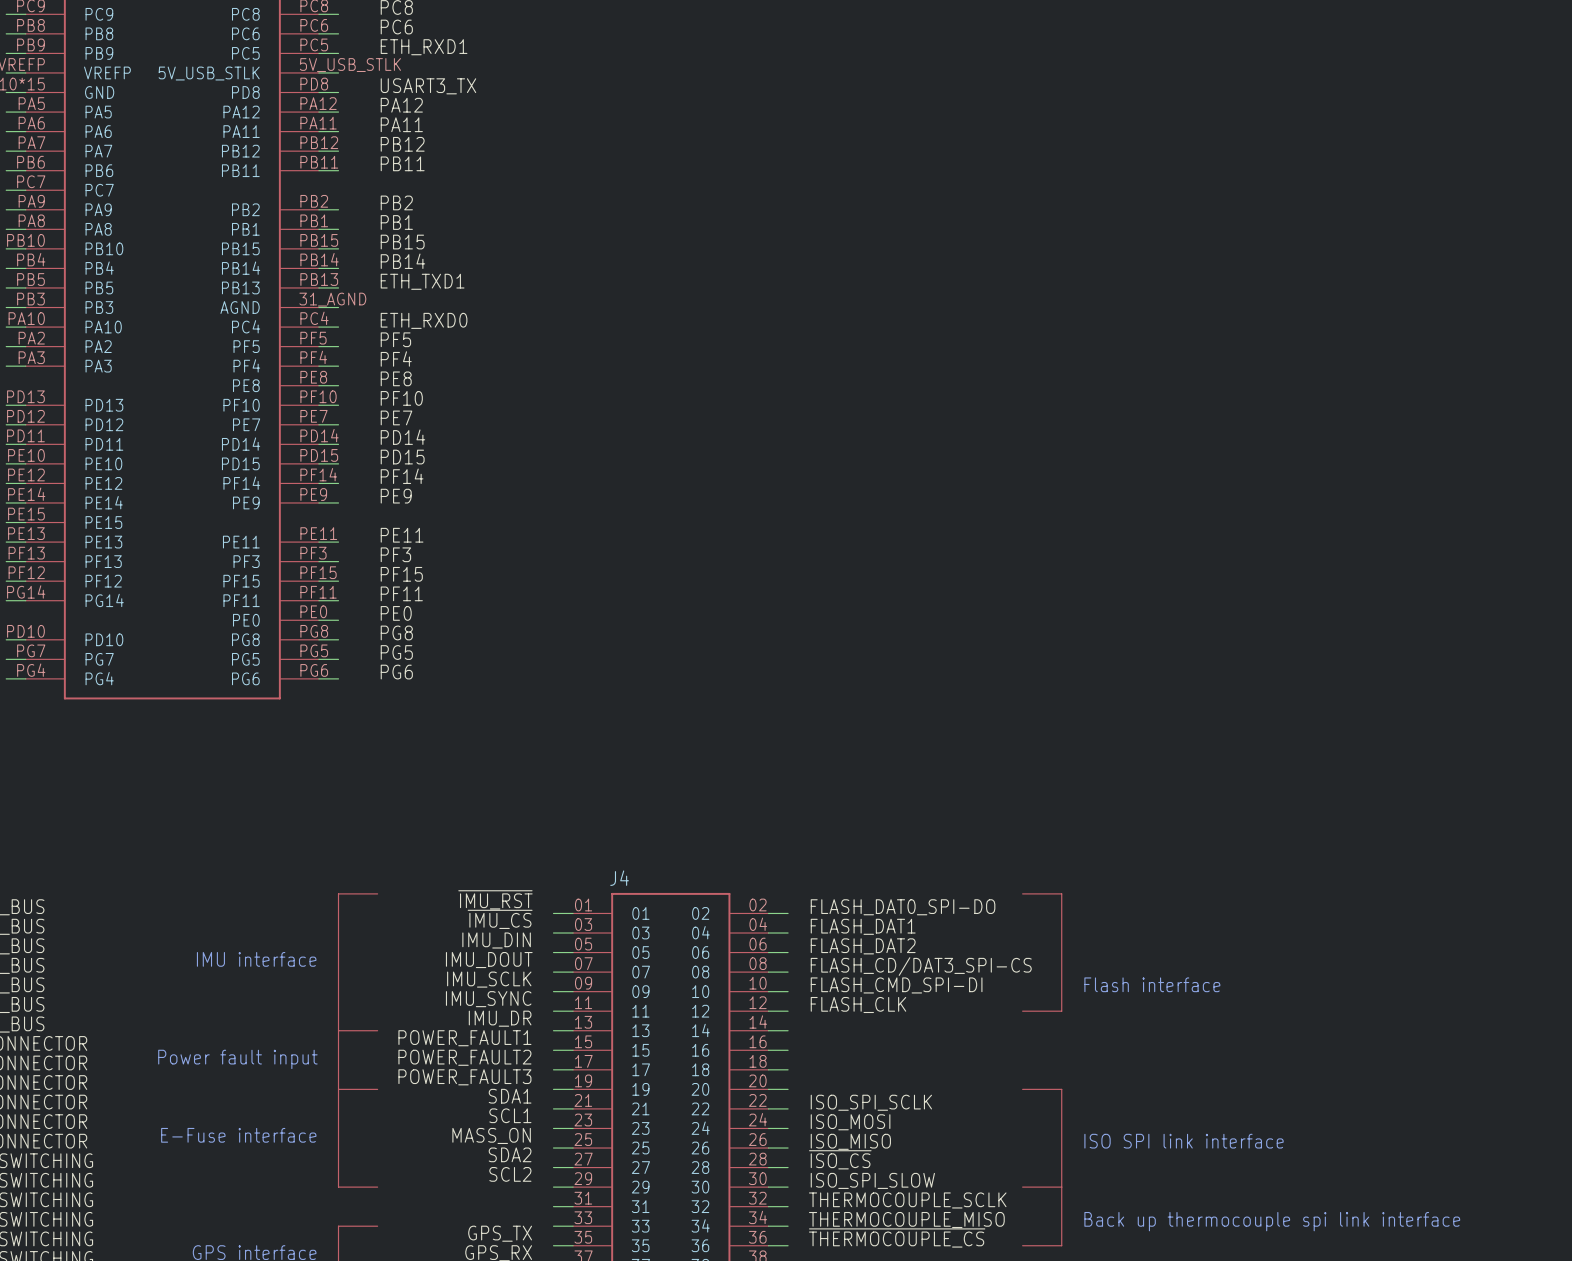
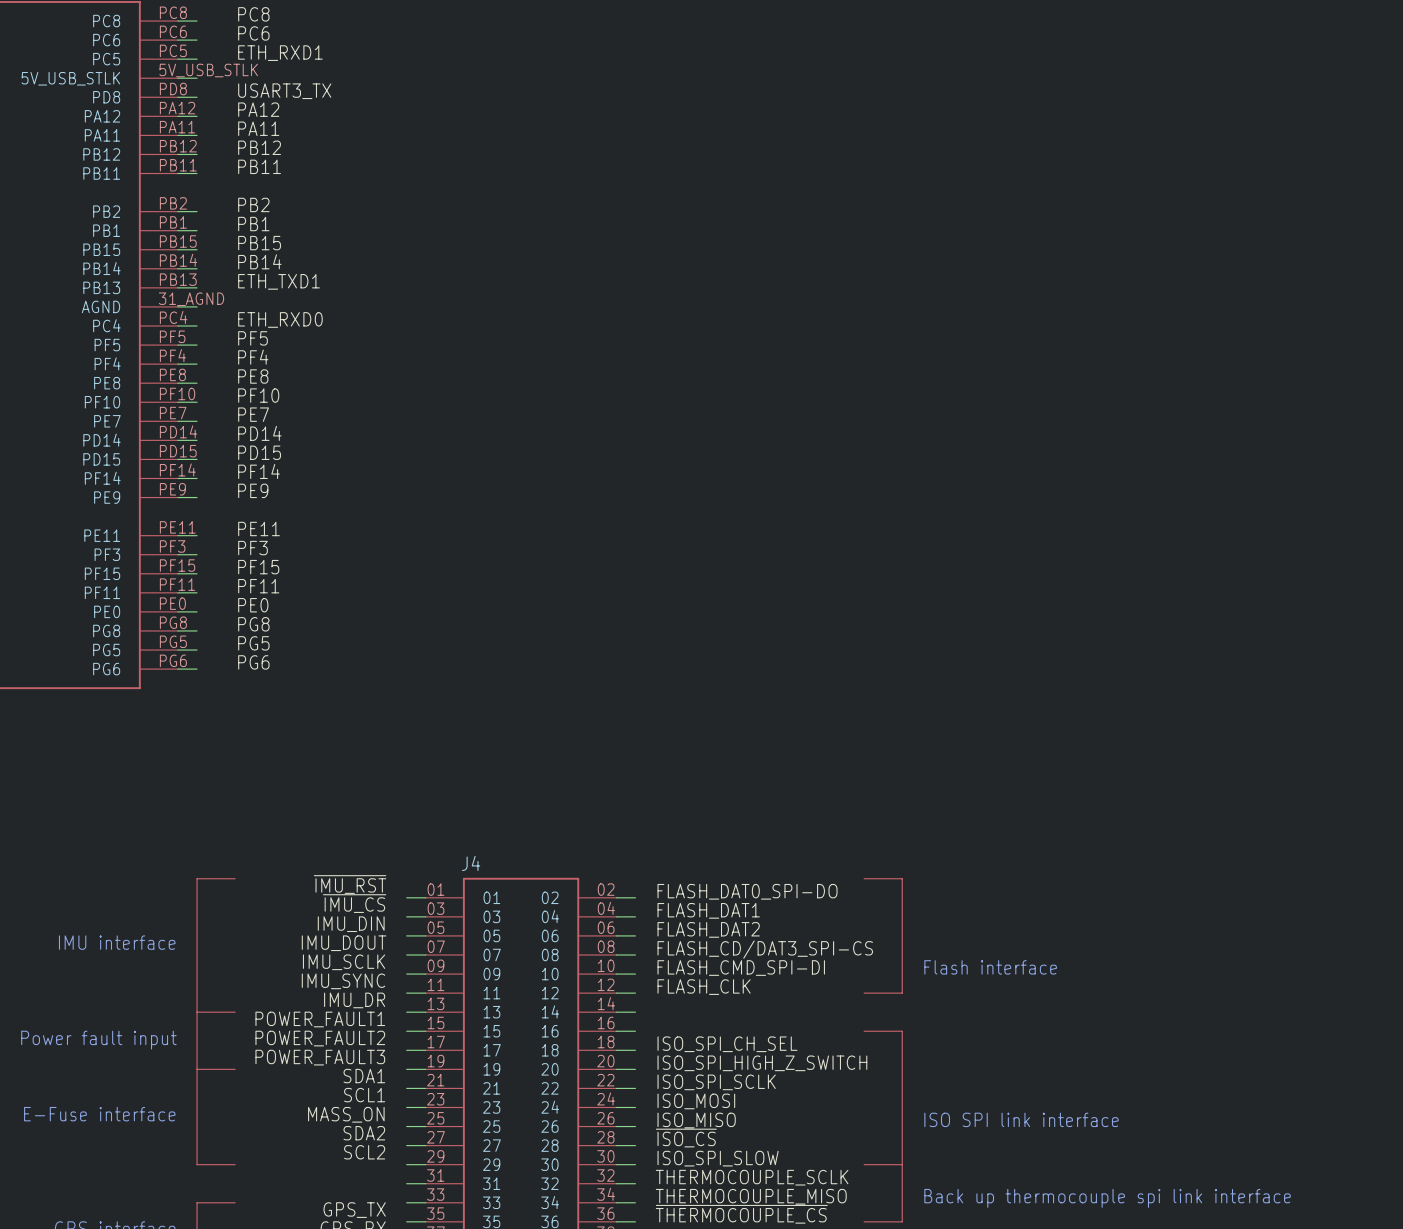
label: none -> ISO_SPI_CH_SEL (727, 1044)
label: none -> ISO_SPI_HIGH_Z_SWITCH (762, 1063)
line: (1022, 1089) (1061, 1089) -> (864, 1031) (902, 1031) (902, 1069)

